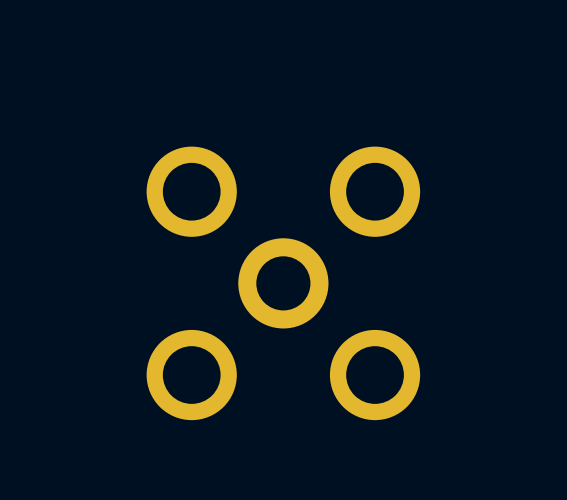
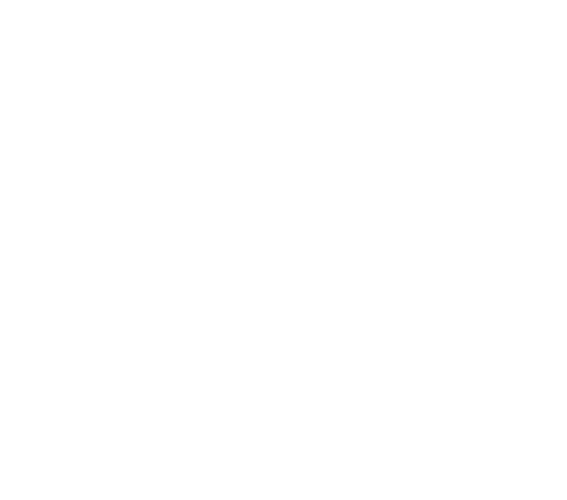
part: (283, 283) -> none

